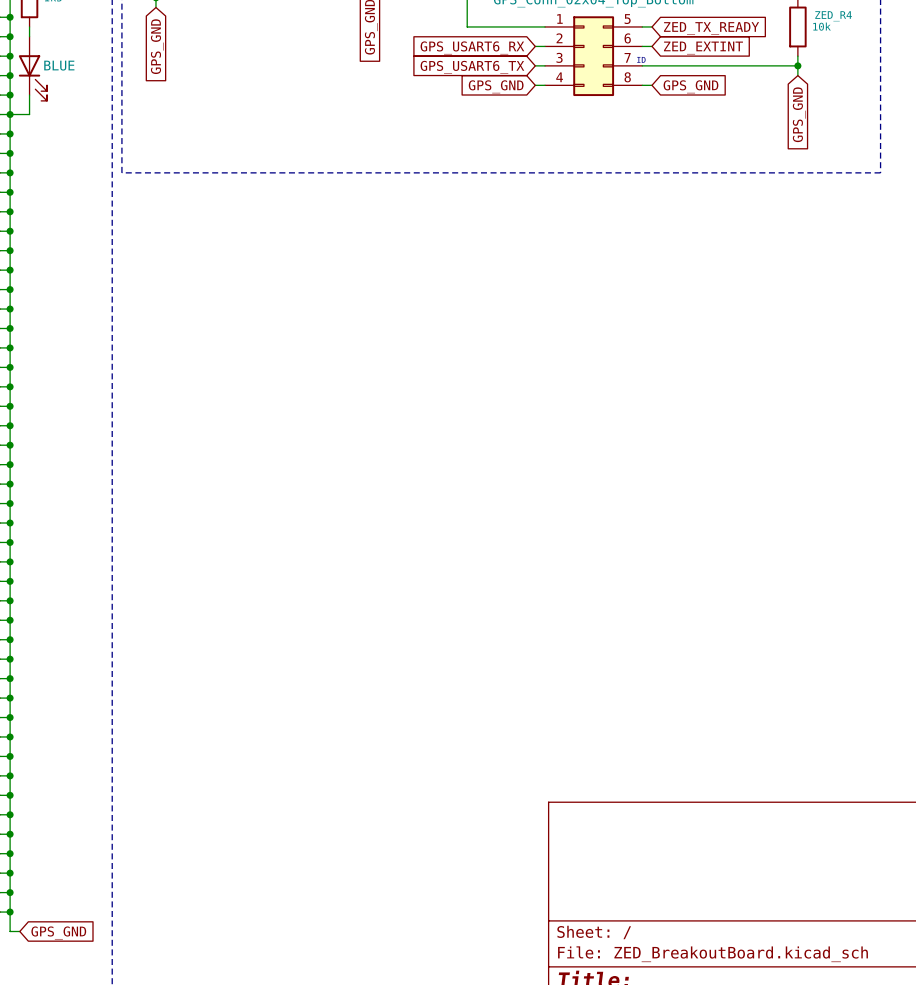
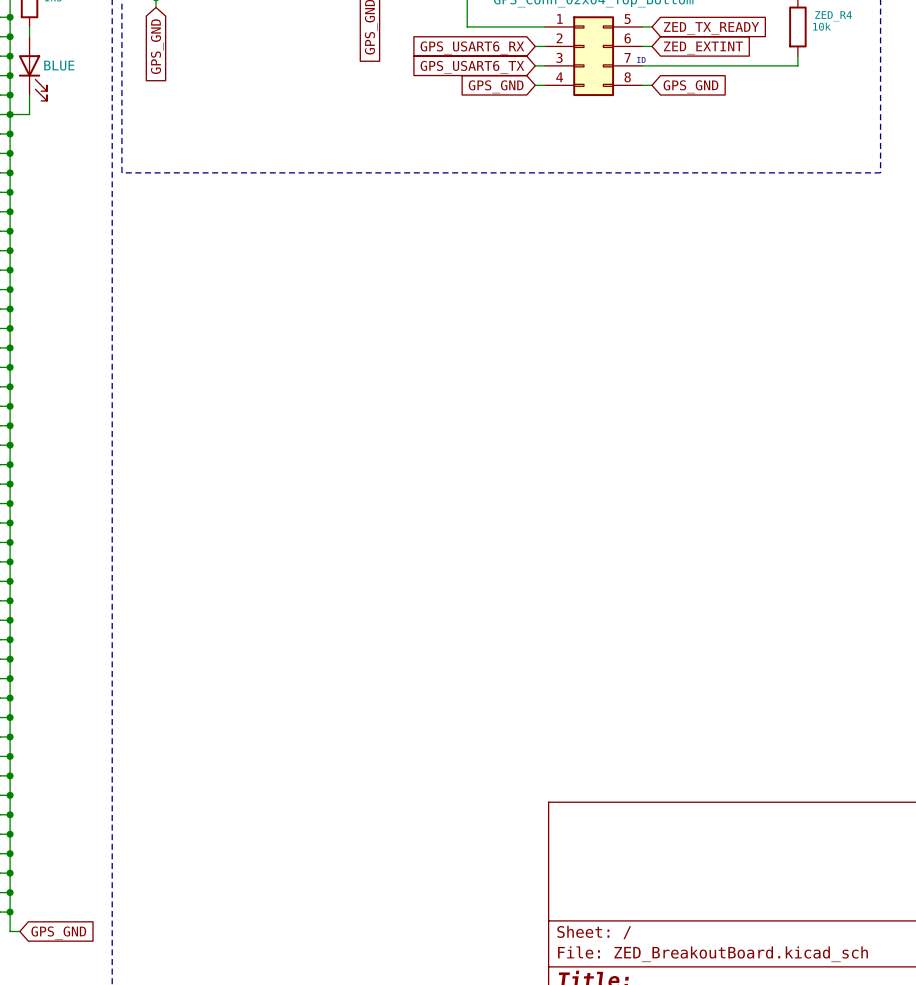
wire: (797, 65) (797, 75) -> none
junction: (797, 65) -> none
global label: GPS_GND (799, 114) -> none

